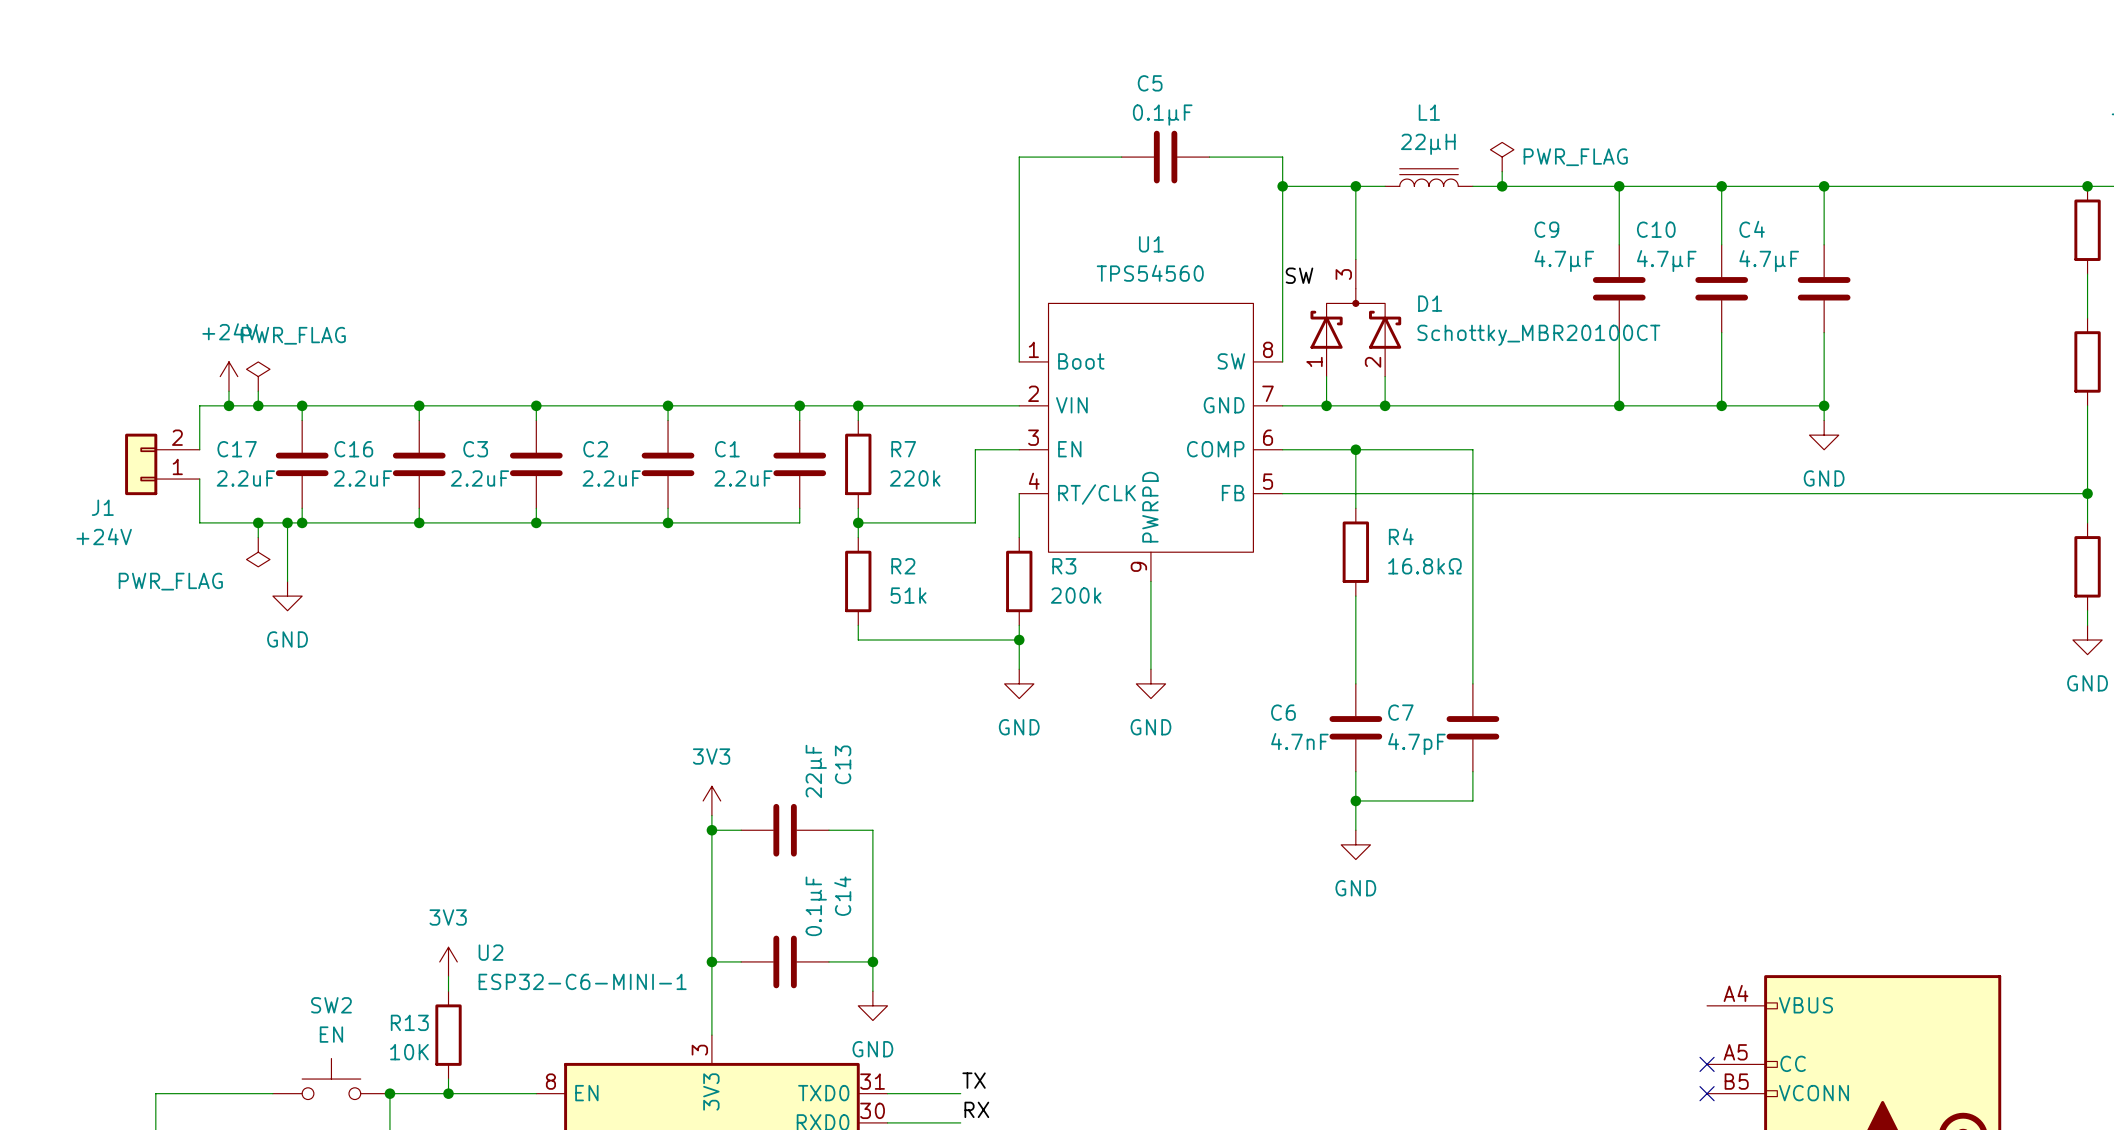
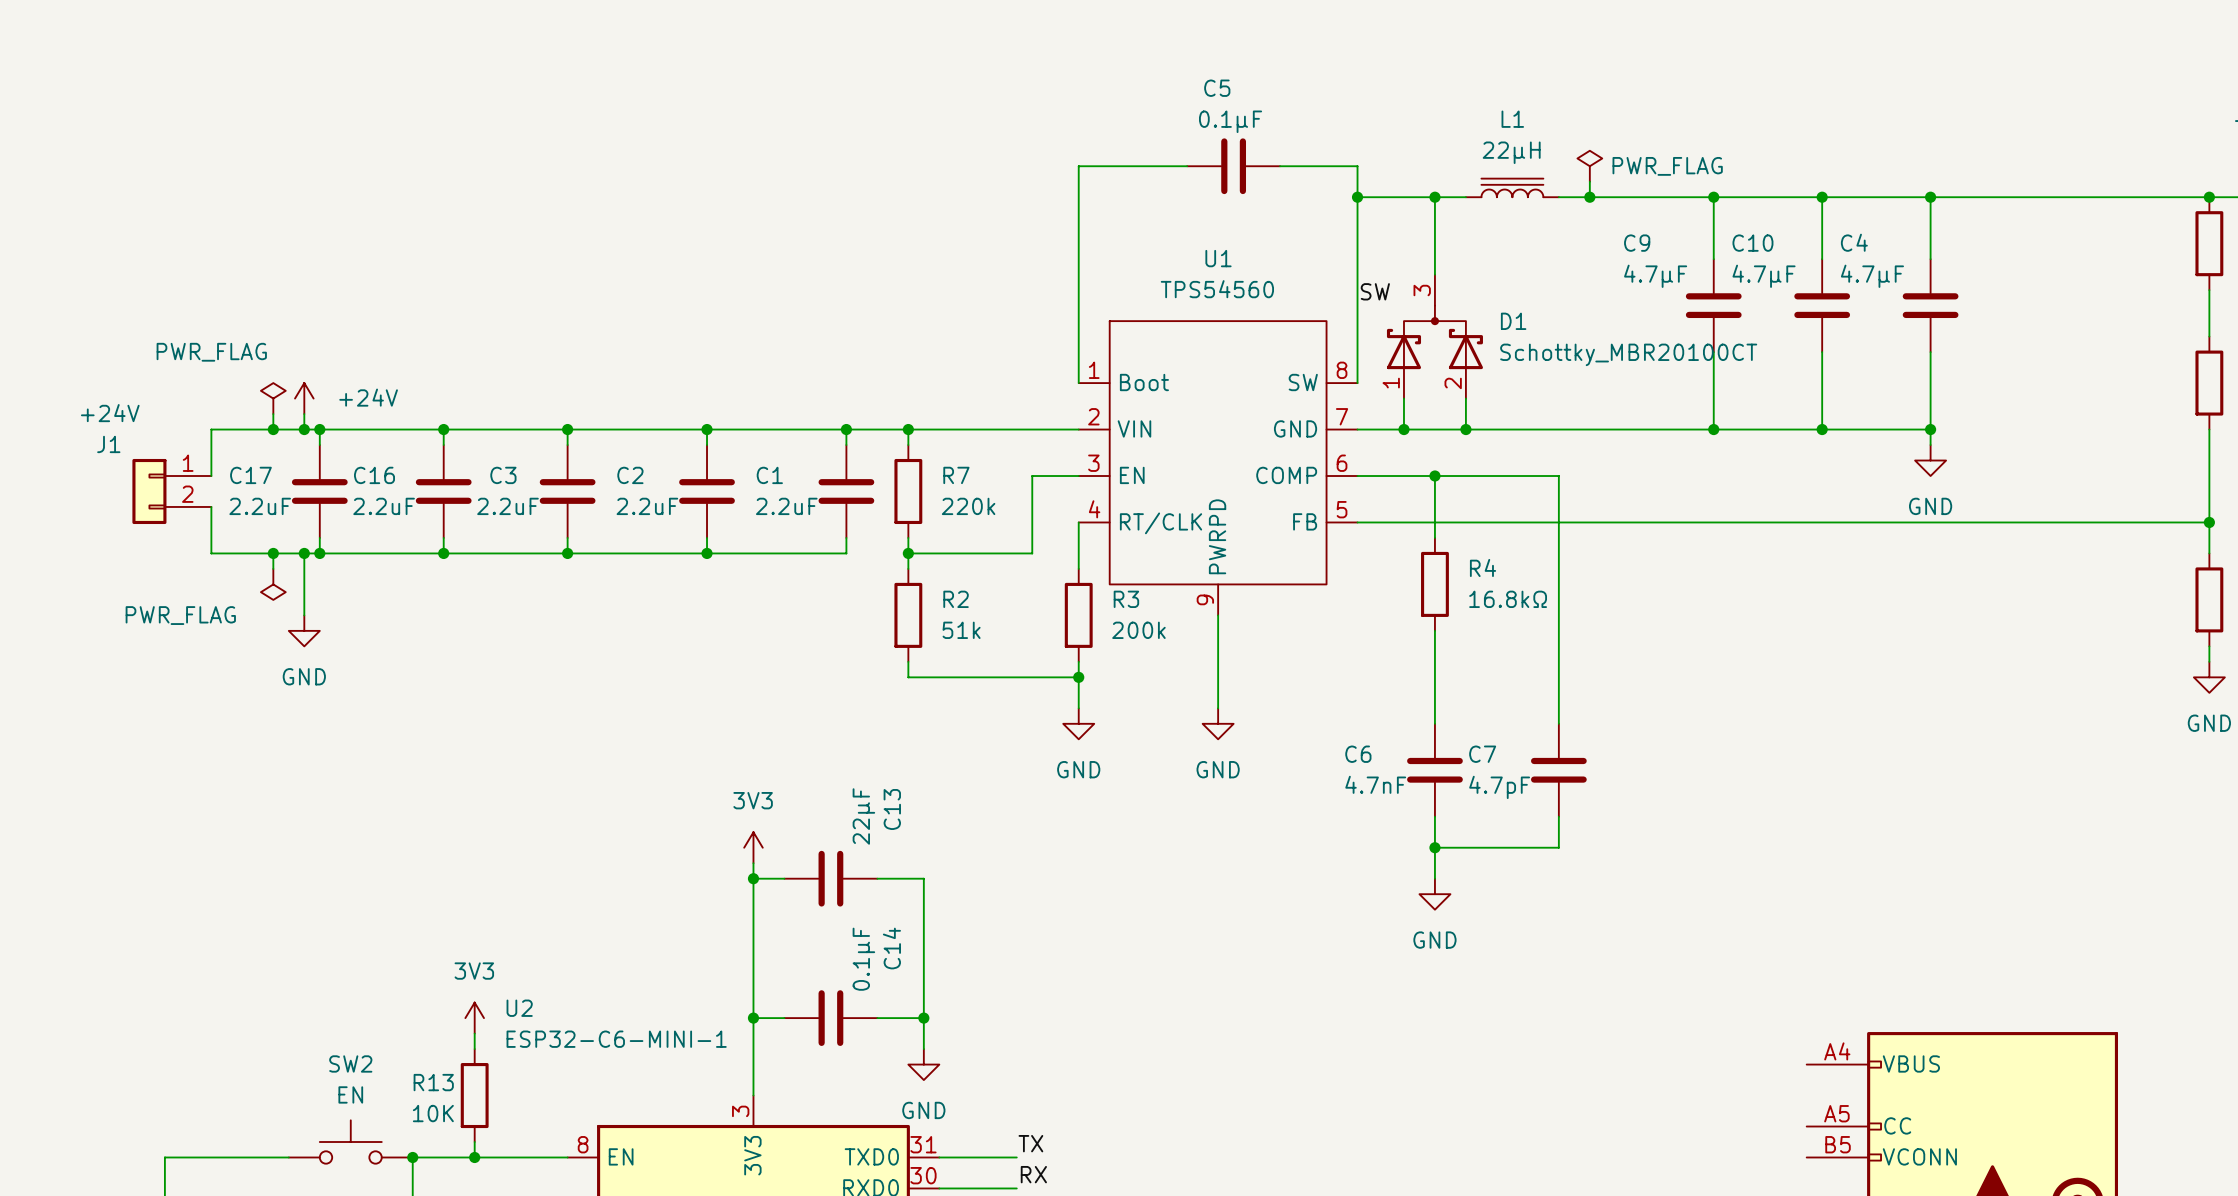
power symbol text position: +24V (230, 331) -> +24V (368, 397)
power symbol text position: PWR_FLAG (293, 335) -> PWR_FLAG (211, 352)
power symbol position: +24V (228, 376) -> +24V (304, 398)
wire: (228, 391) (228, 405) -> (304, 414) (304, 429)
junction position: (228, 405) -> (304, 429)
J1 flip: as is (141, 464) -> up-down (149, 491)
no-connect mark: (1707, 1064) -> none
no-connect mark: (1707, 1093) -> none

